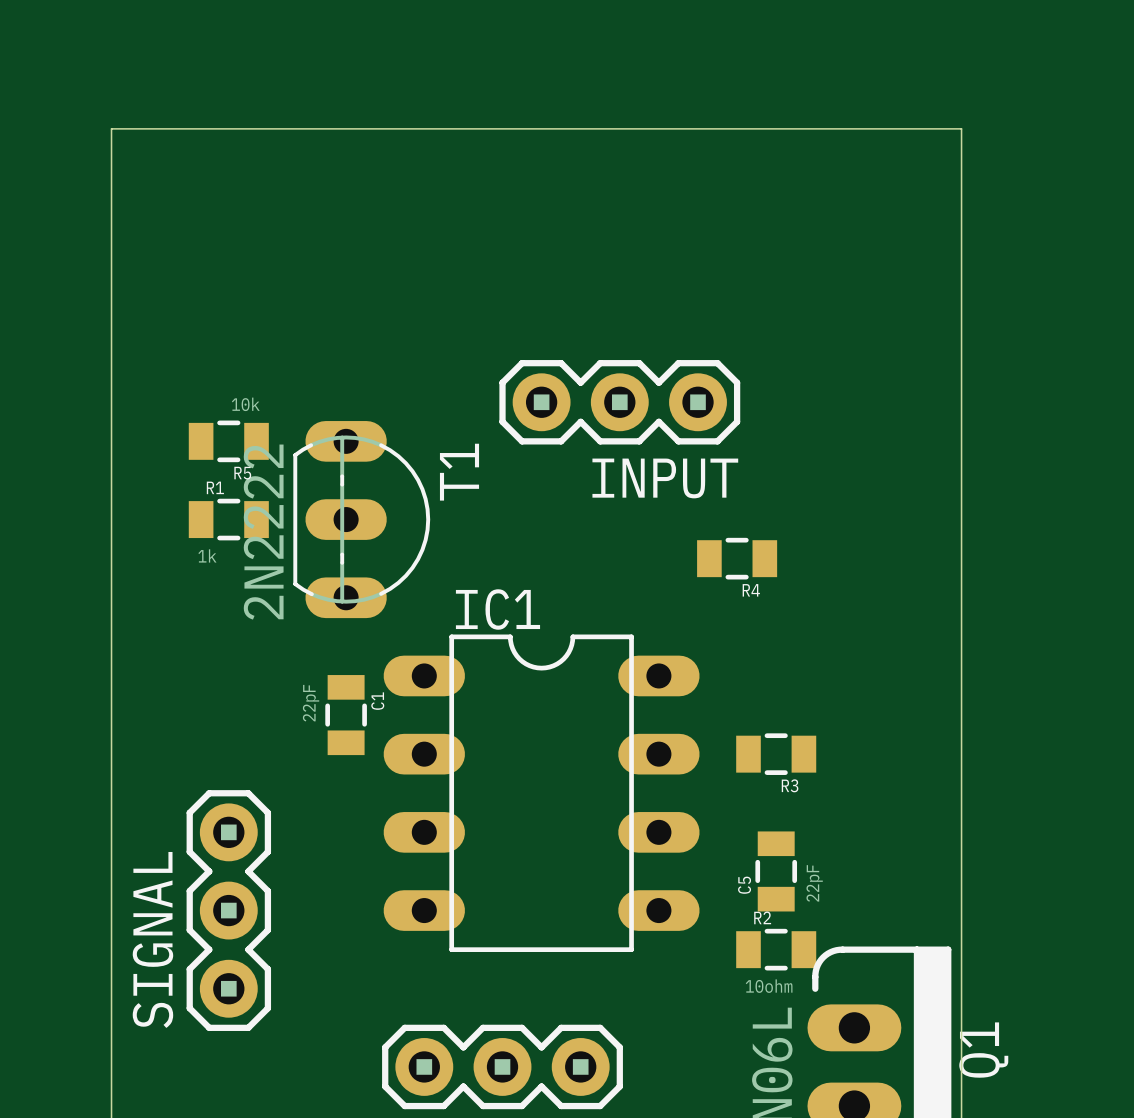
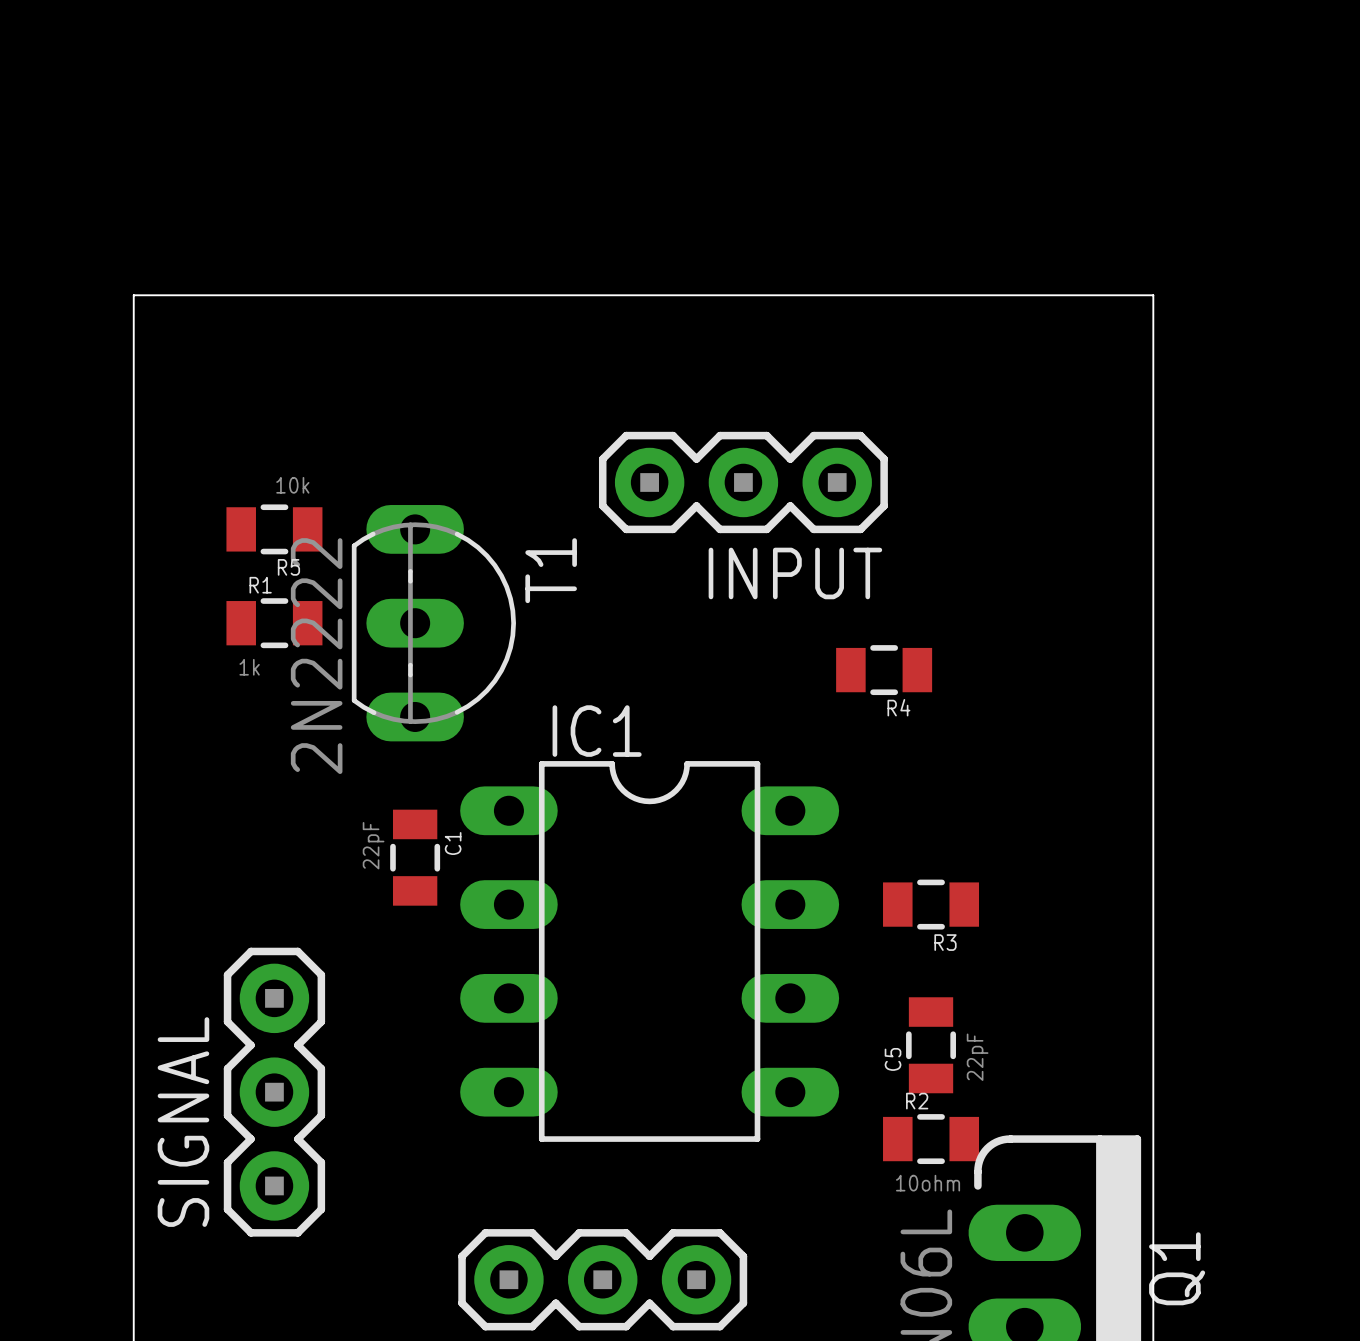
board edge: (111, 246) (111, 128) (961, 128) (961, 246) -> (133, 295) (1153, 295)

